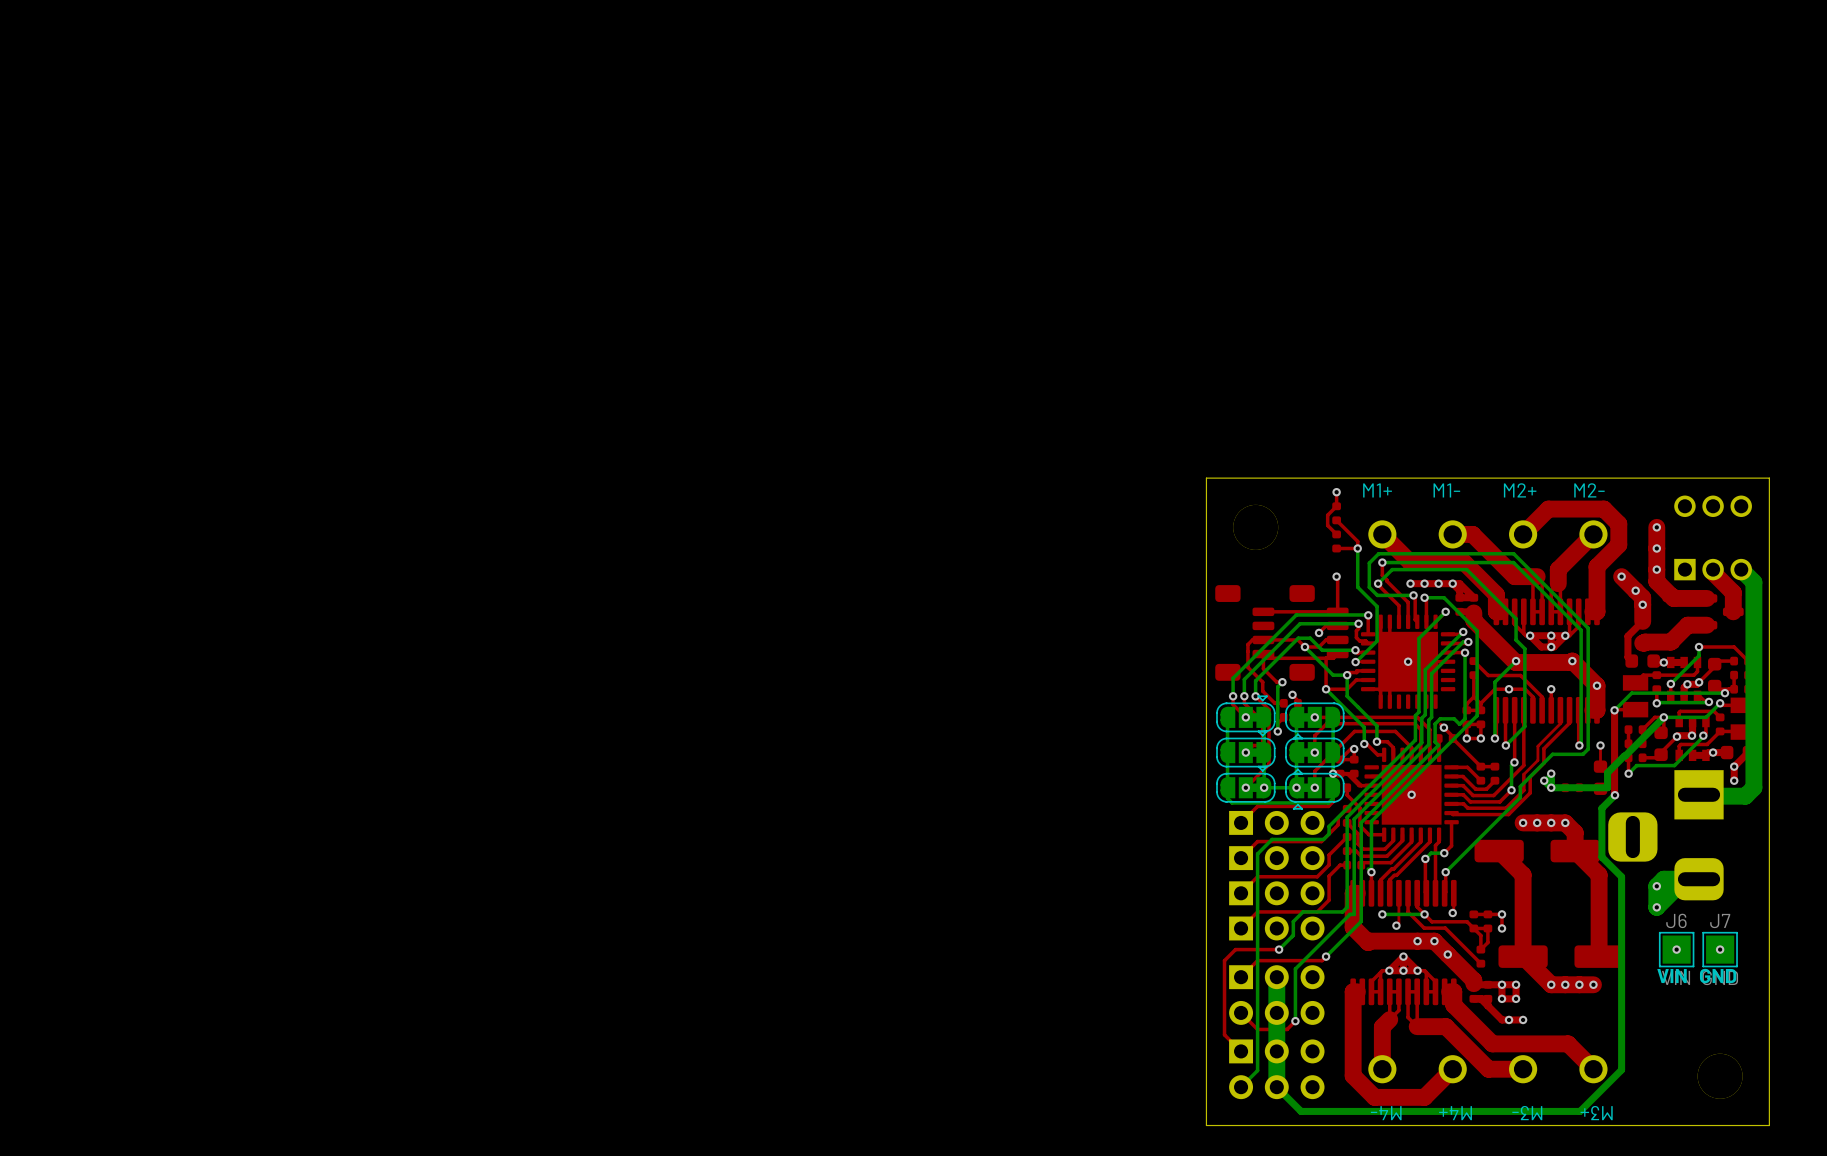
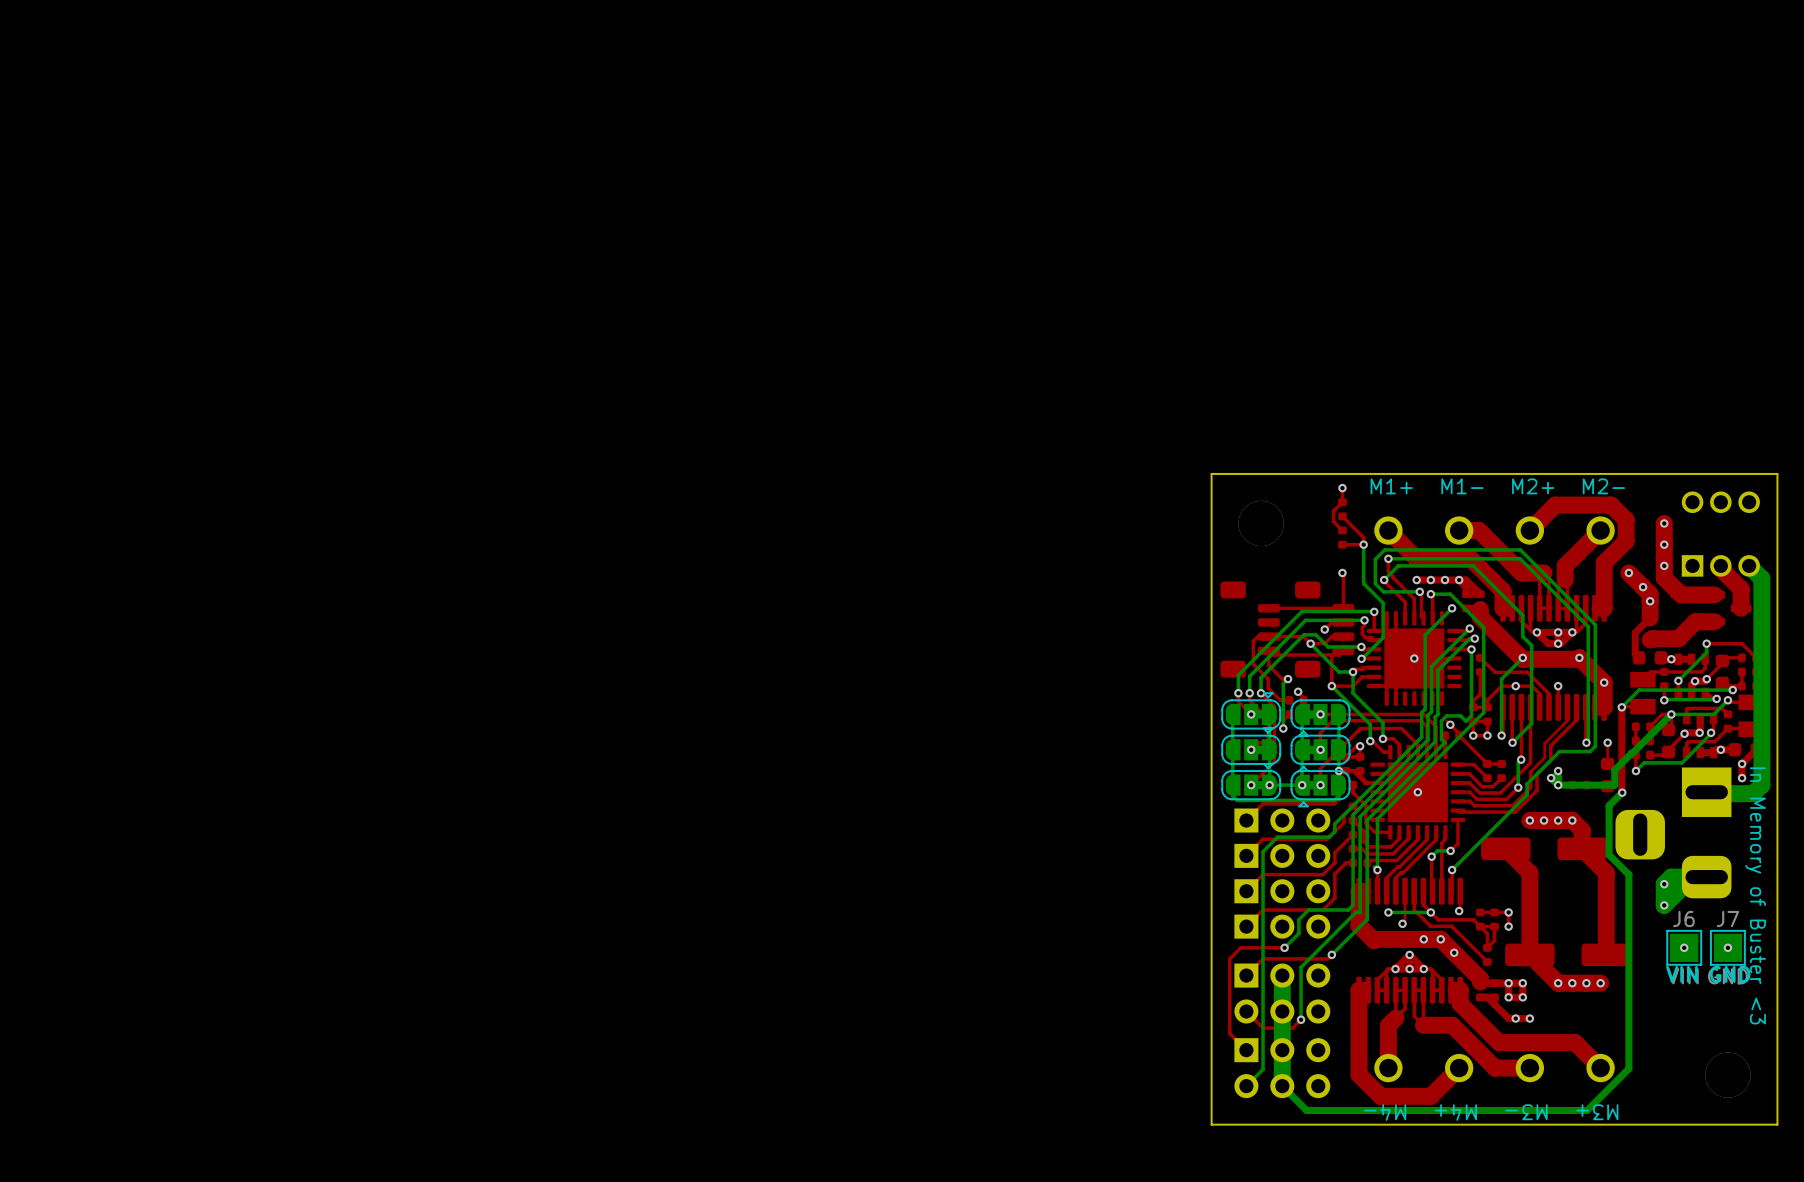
text: none -> In Memory of Buster <3 (1755, 895)

